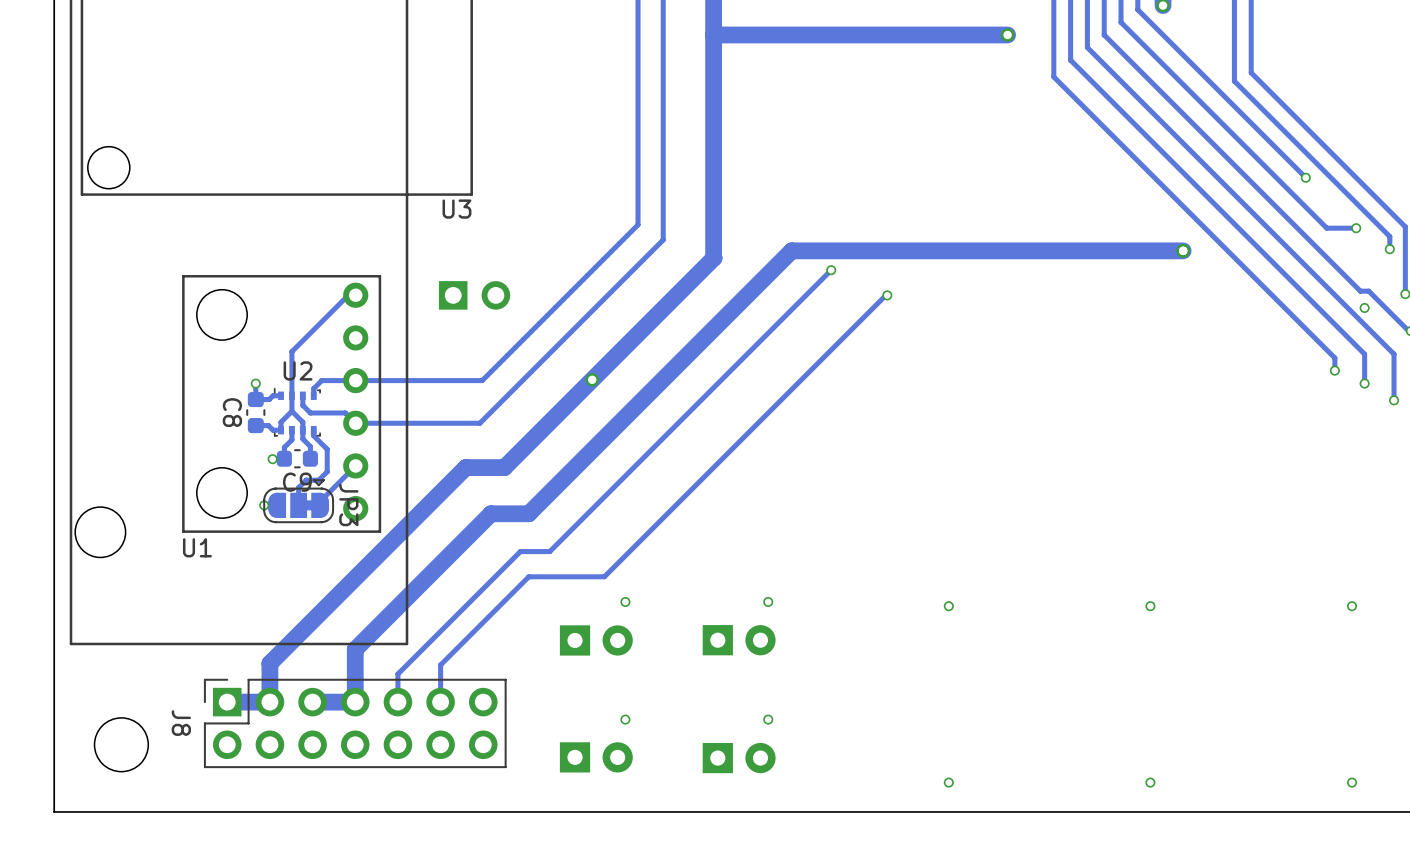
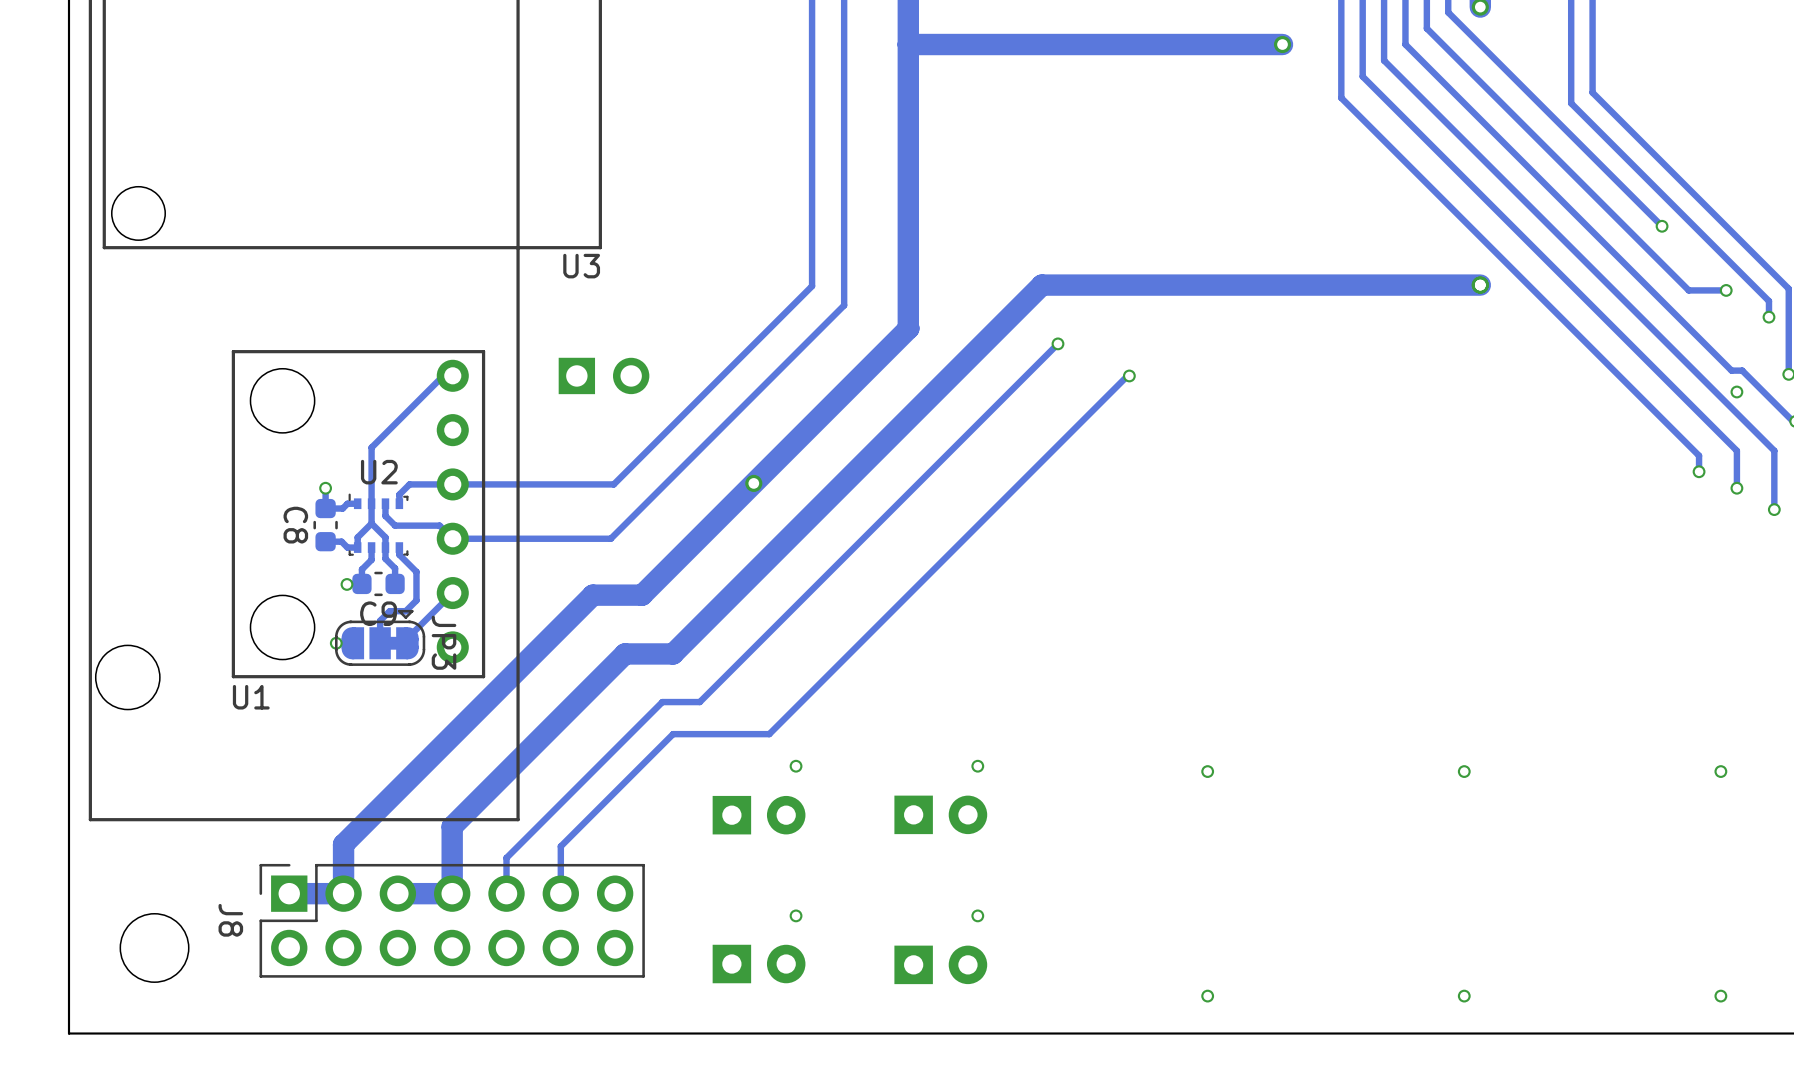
track: (1183, 250) (791, 250) -> (1480, 285) (1041, 285) (1007, 319)
via position: (1183, 250) -> (1480, 285)

